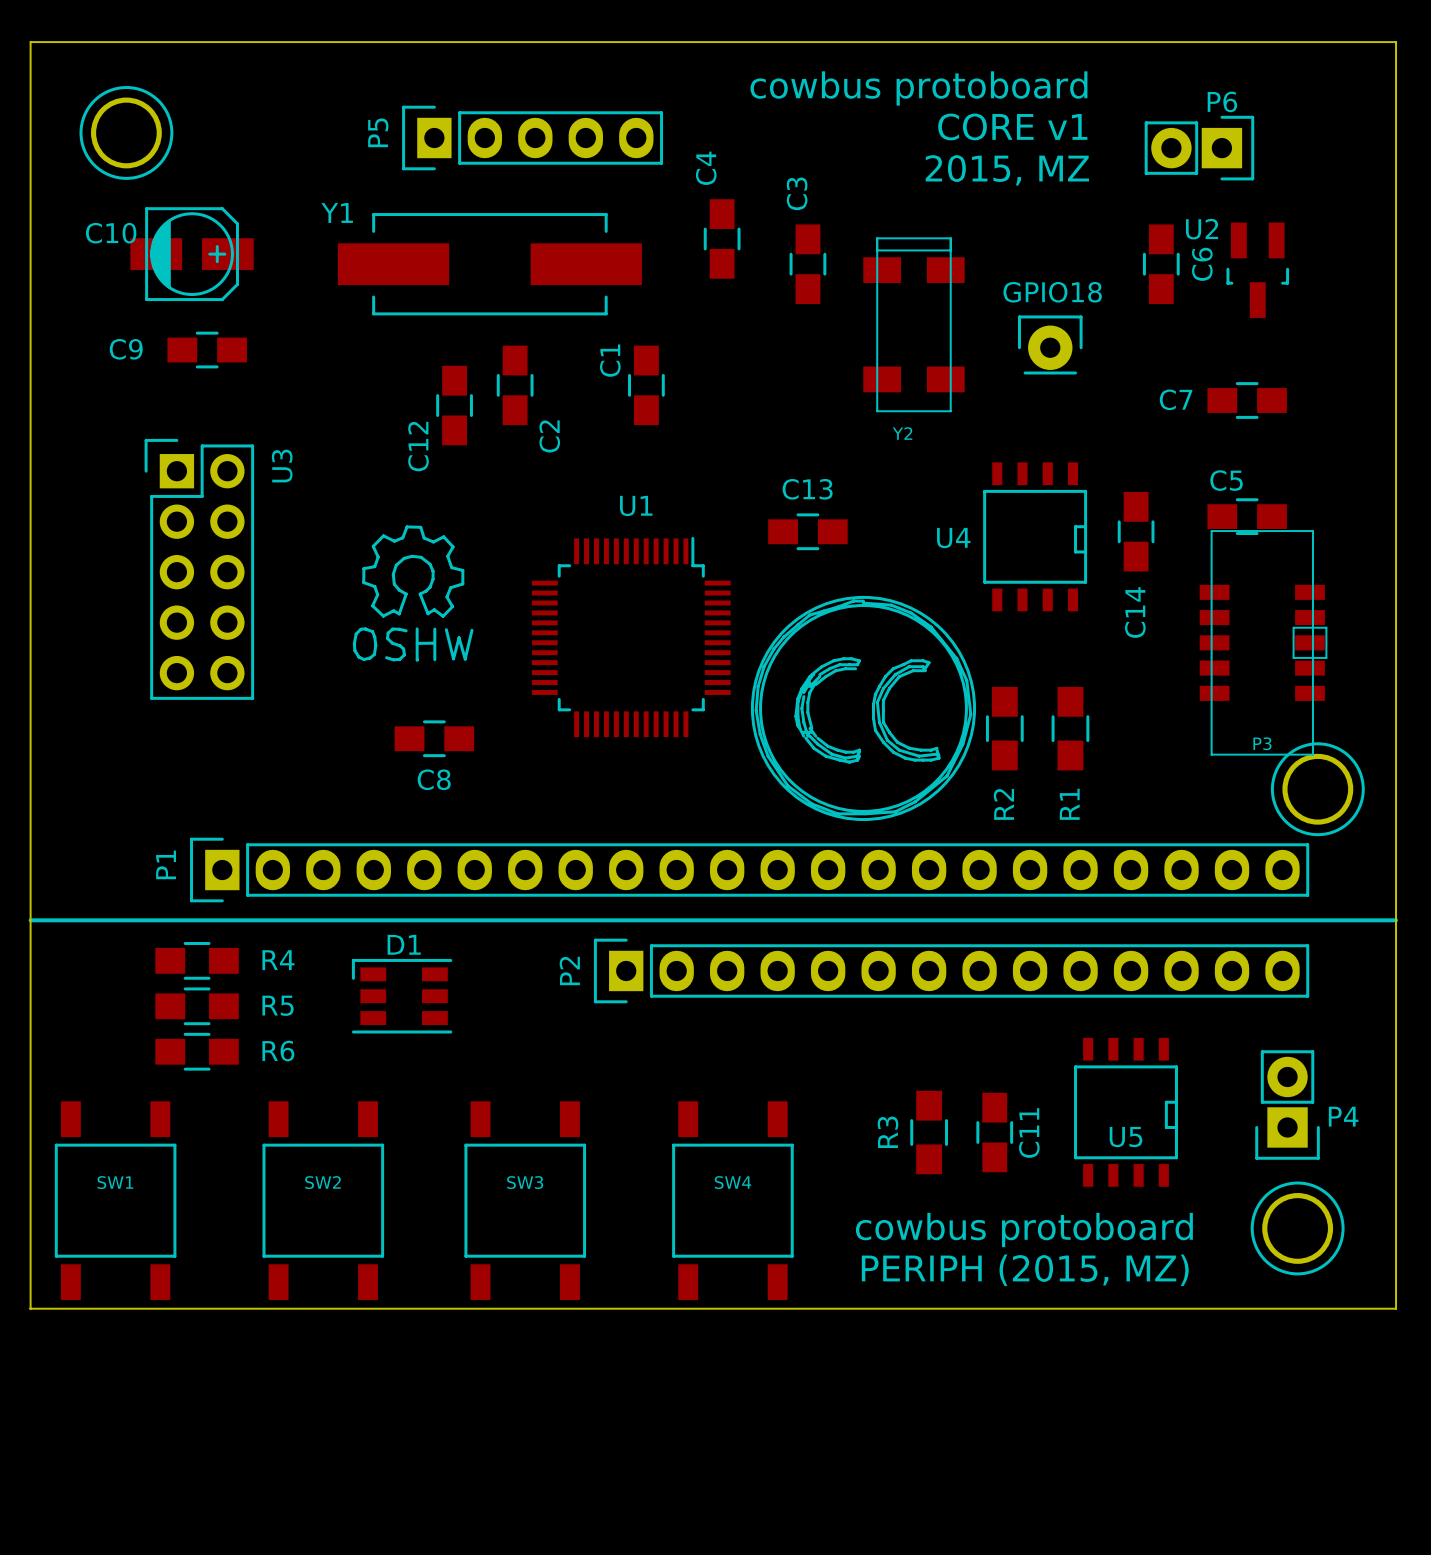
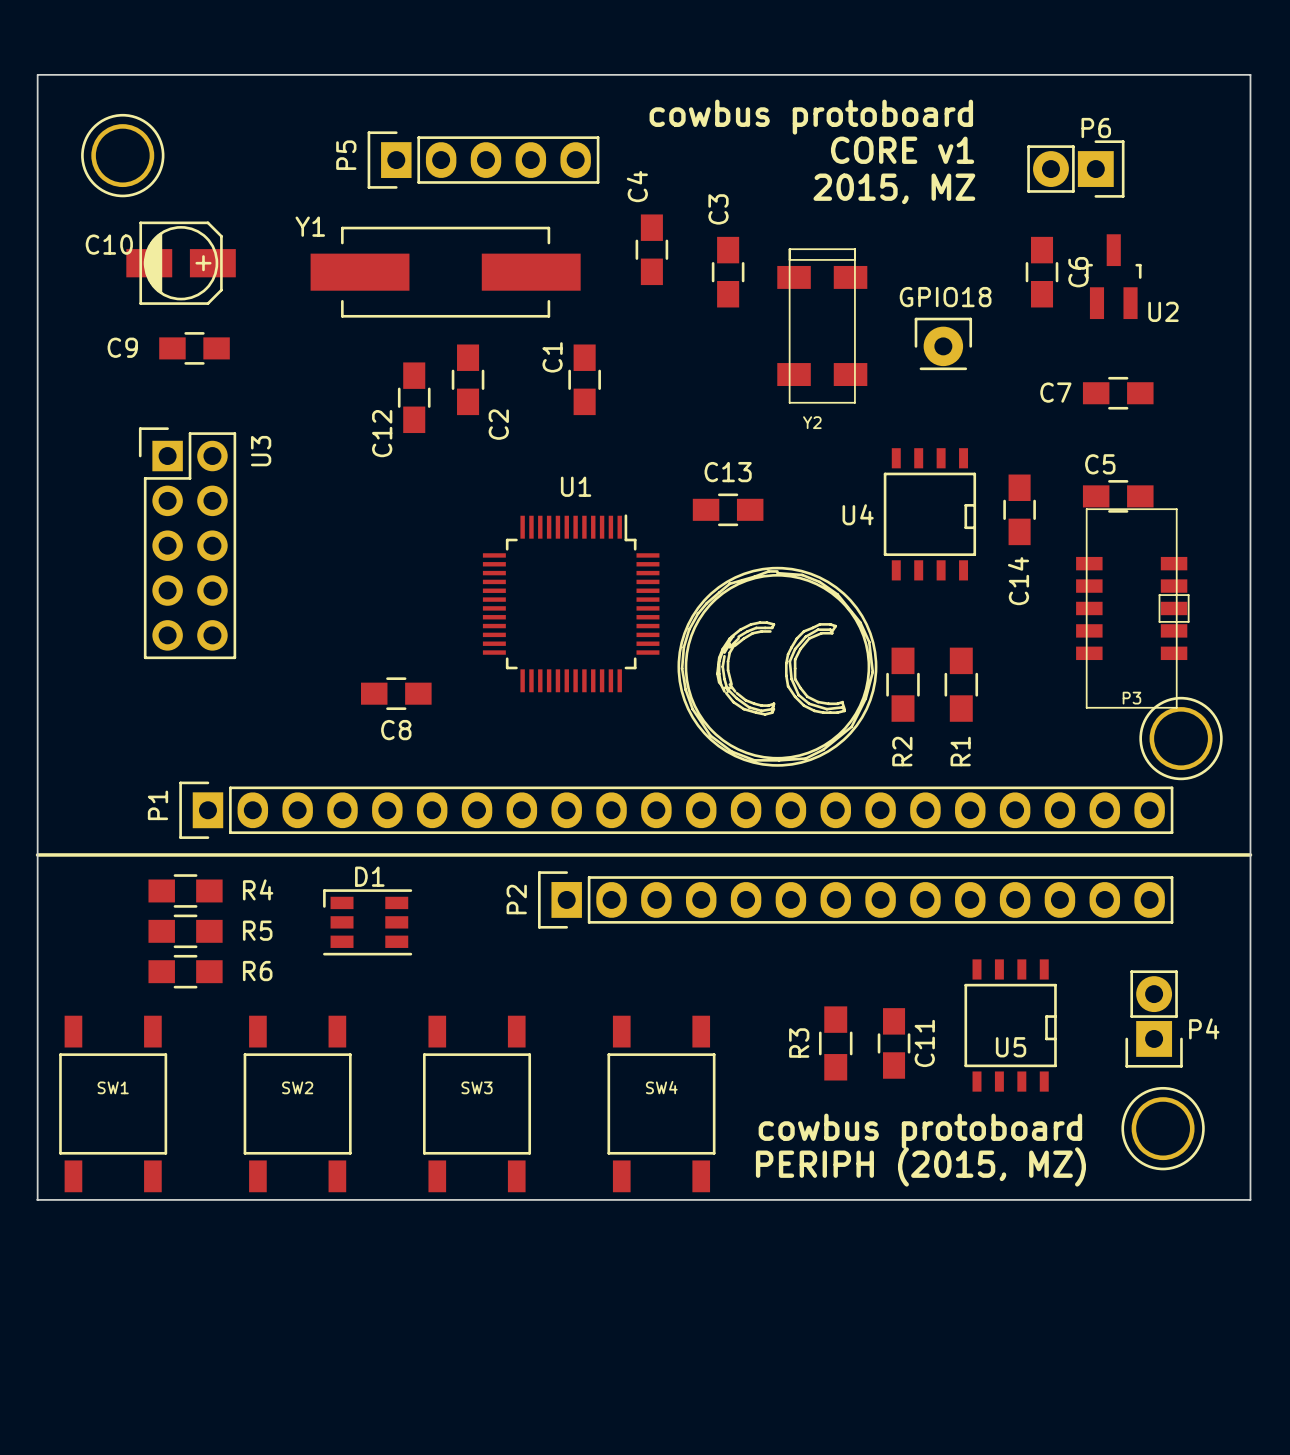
U2 rotation: 0° (1257, 270) -> 180° (1113, 276)
drawing: [352, 525, 474, 662] -> none

